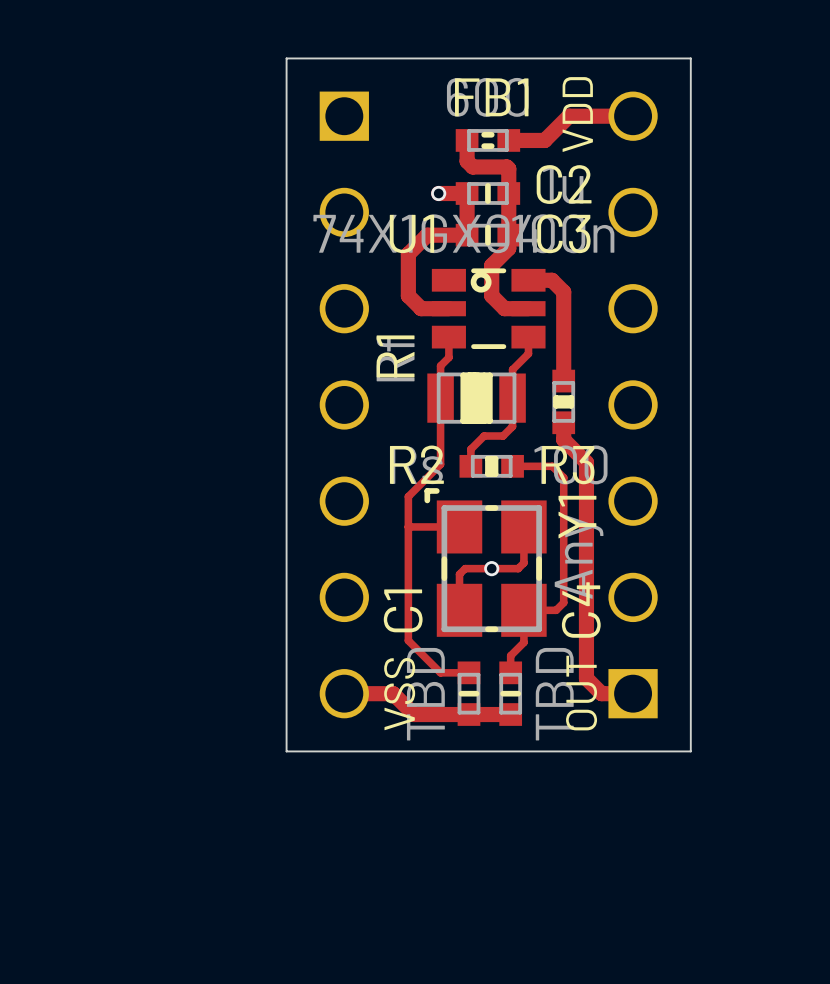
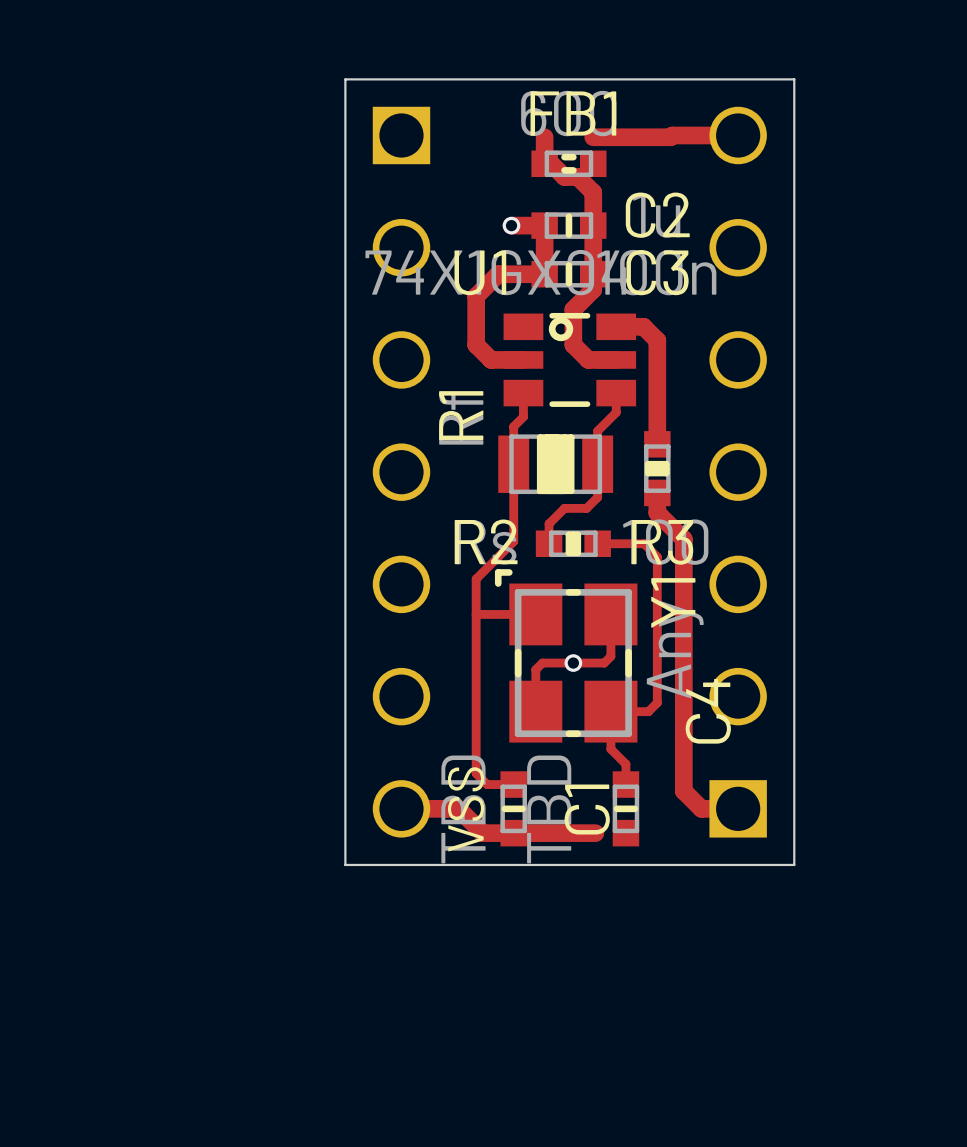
board edge: (286, 58) (286, 751) (690, 751) (690, 58) (286, 58) -> (345, 79) (345, 864) (794, 864) (794, 79) (345, 79)
text: VDD (577, 114) -> none
track: (576, 116) (569, 116) (544, 140) (508, 140) -> (672, 135) (670, 137) (593, 137)
track: (467, 140) (467, 161) (472, 166) (506, 166) (508, 168) -> (544, 137) (544, 157) (564, 177) (577, 177) (593, 192) (593, 196)
C1 name position: C1 (403, 610) -> C1 (587, 809)
track: (408, 640) (440, 672) (468, 672) -> (476, 746) (476, 773) (487, 784) (513, 784)
track: (523, 642) (510, 655) (510, 672) -> (610, 749) (625, 764) (625, 784)
C1 position: (468, 693) -> (513, 808)
C4 position: (510, 693) -> (625, 808)
text: OUT (581, 693) -> none
C4 value position: TBD (554, 694) -> TBD (549, 809)

